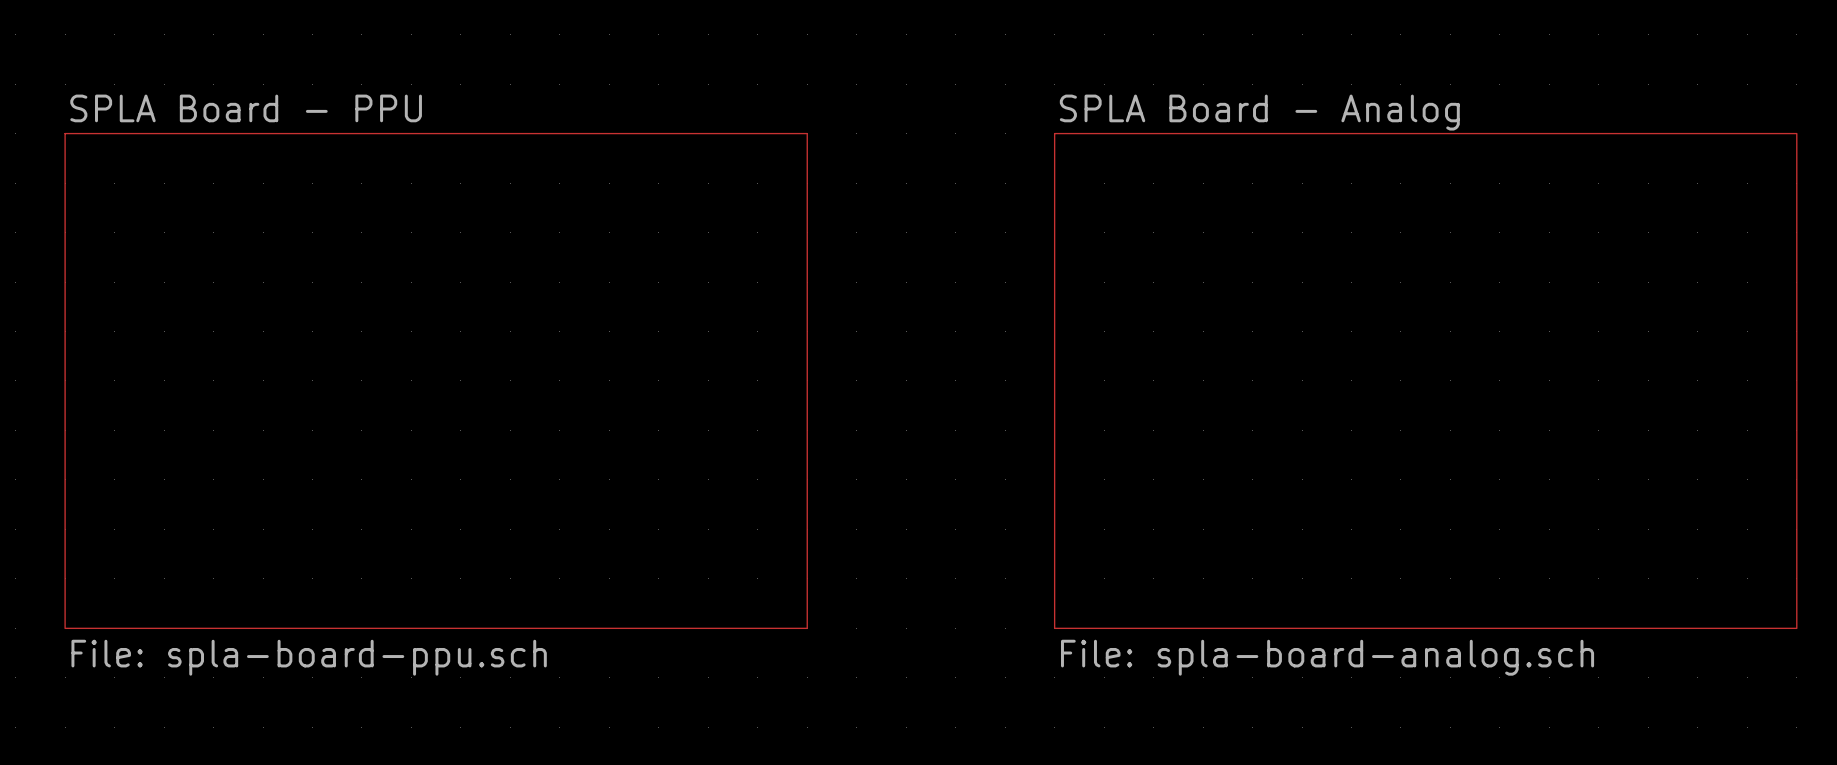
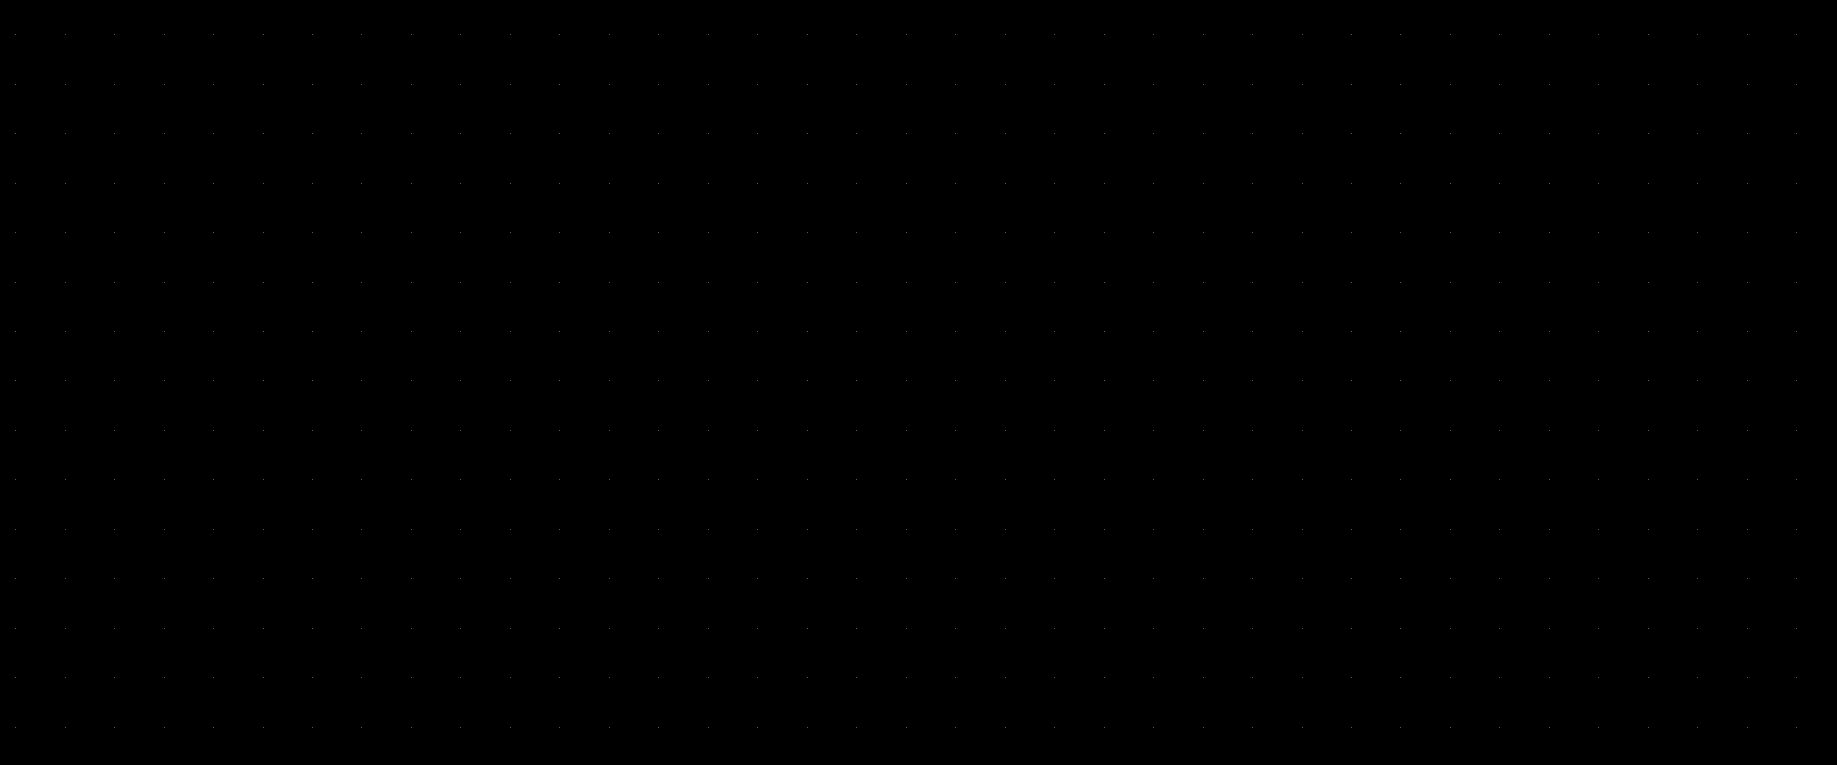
sheet SPLA Board - PPU: File: spla-board-ppu.sch (436, 380) -> none
sheet SPLA Board - Analog: File: spla-board-analog.sch (1425, 380) -> none

